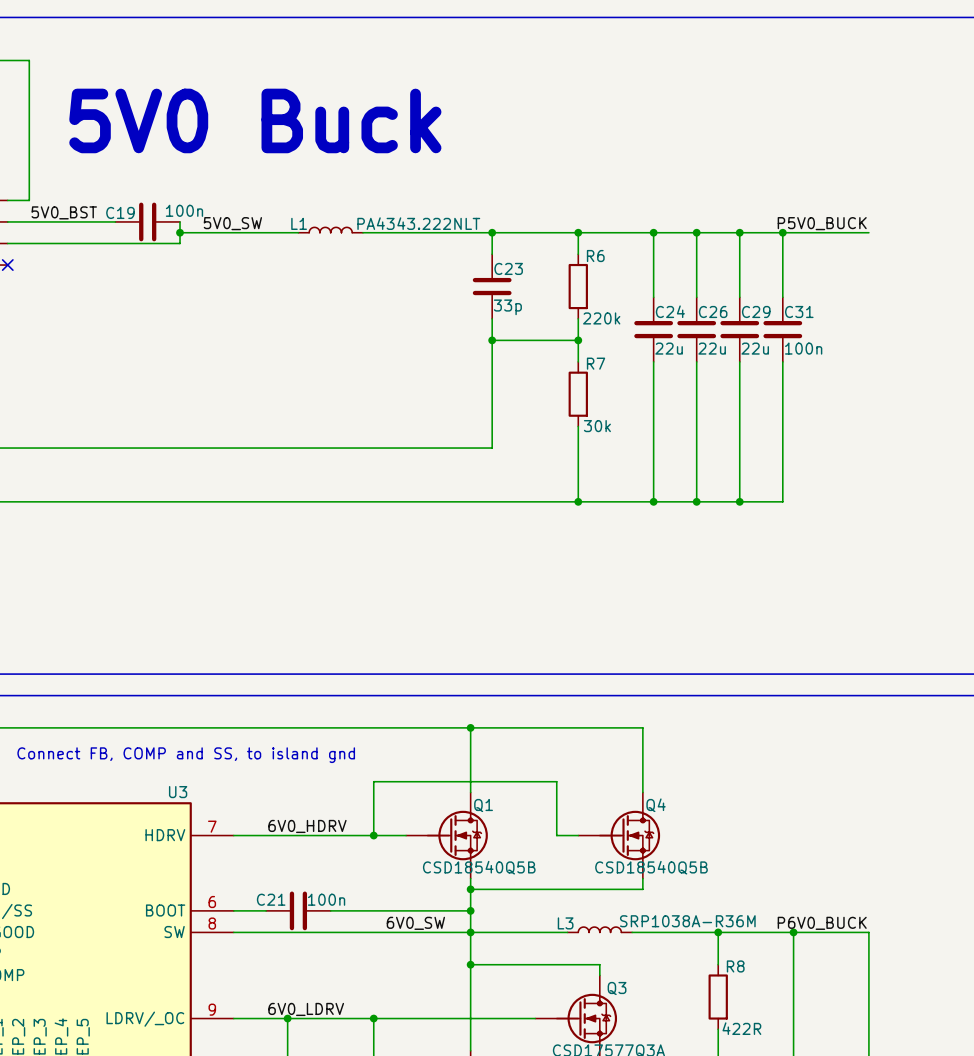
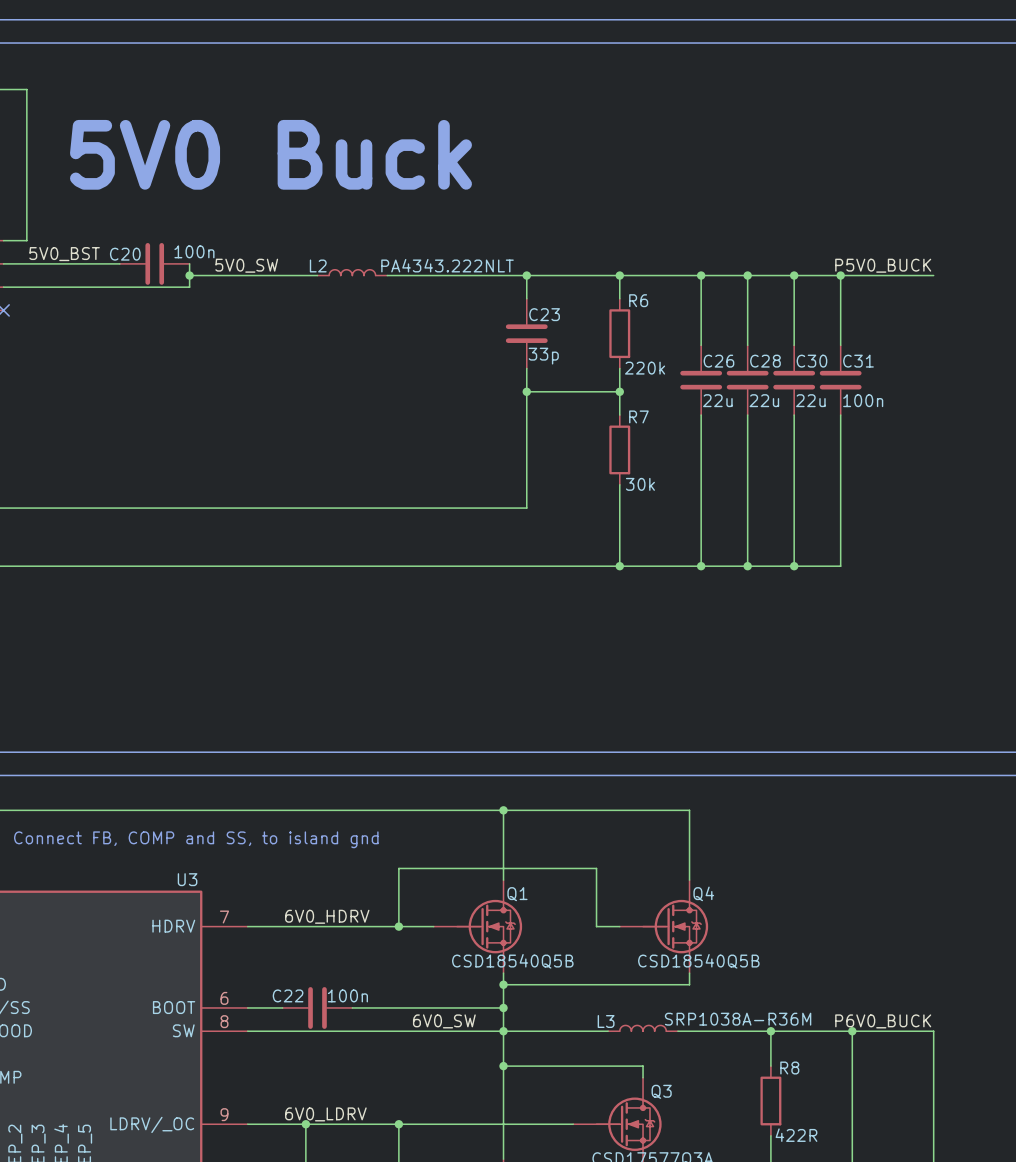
C19 name: C19 (120, 212) -> C20 (125, 254)
L1 name: L1 (299, 223) -> L2 (318, 265)
C24 name: C24 (670, 311) -> C26 (718, 361)
C26 name: C26 (713, 311) -> C28 (765, 361)
C29 name: C29 (756, 311) -> C30 (811, 361)
C21 name: C21 (271, 899) -> C22 (288, 995)

